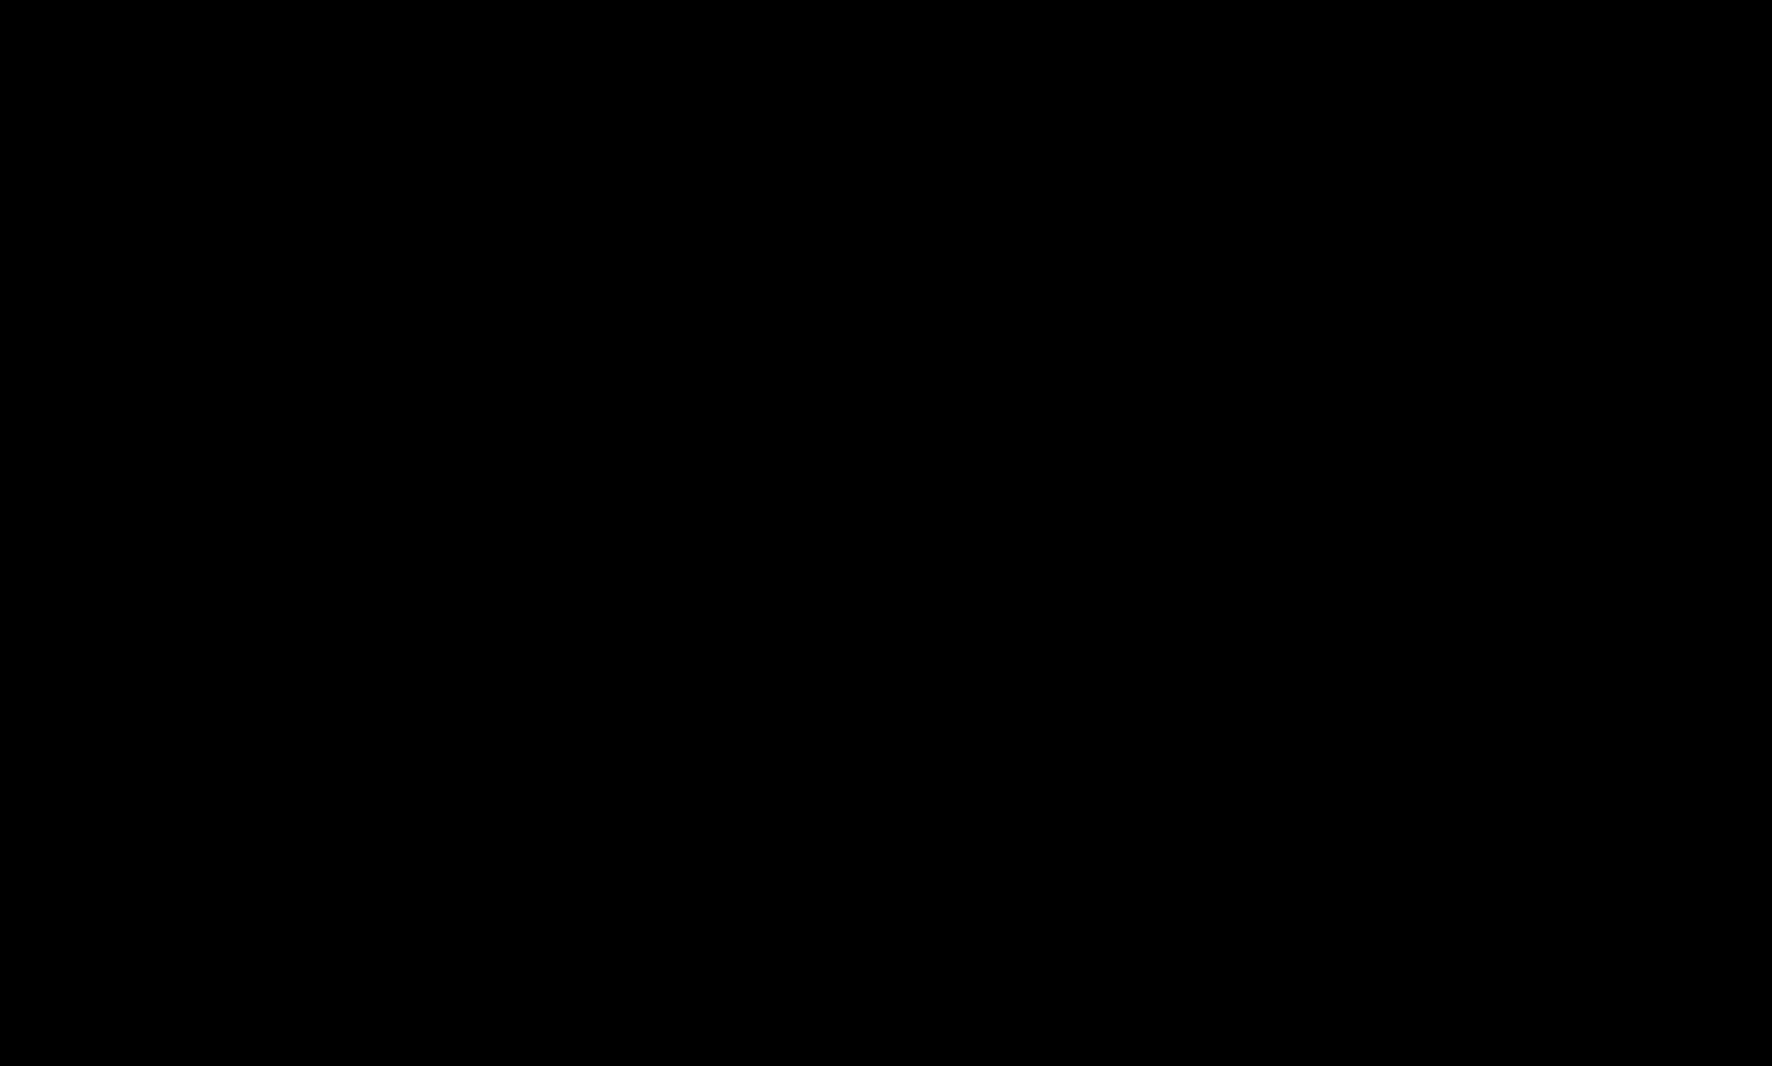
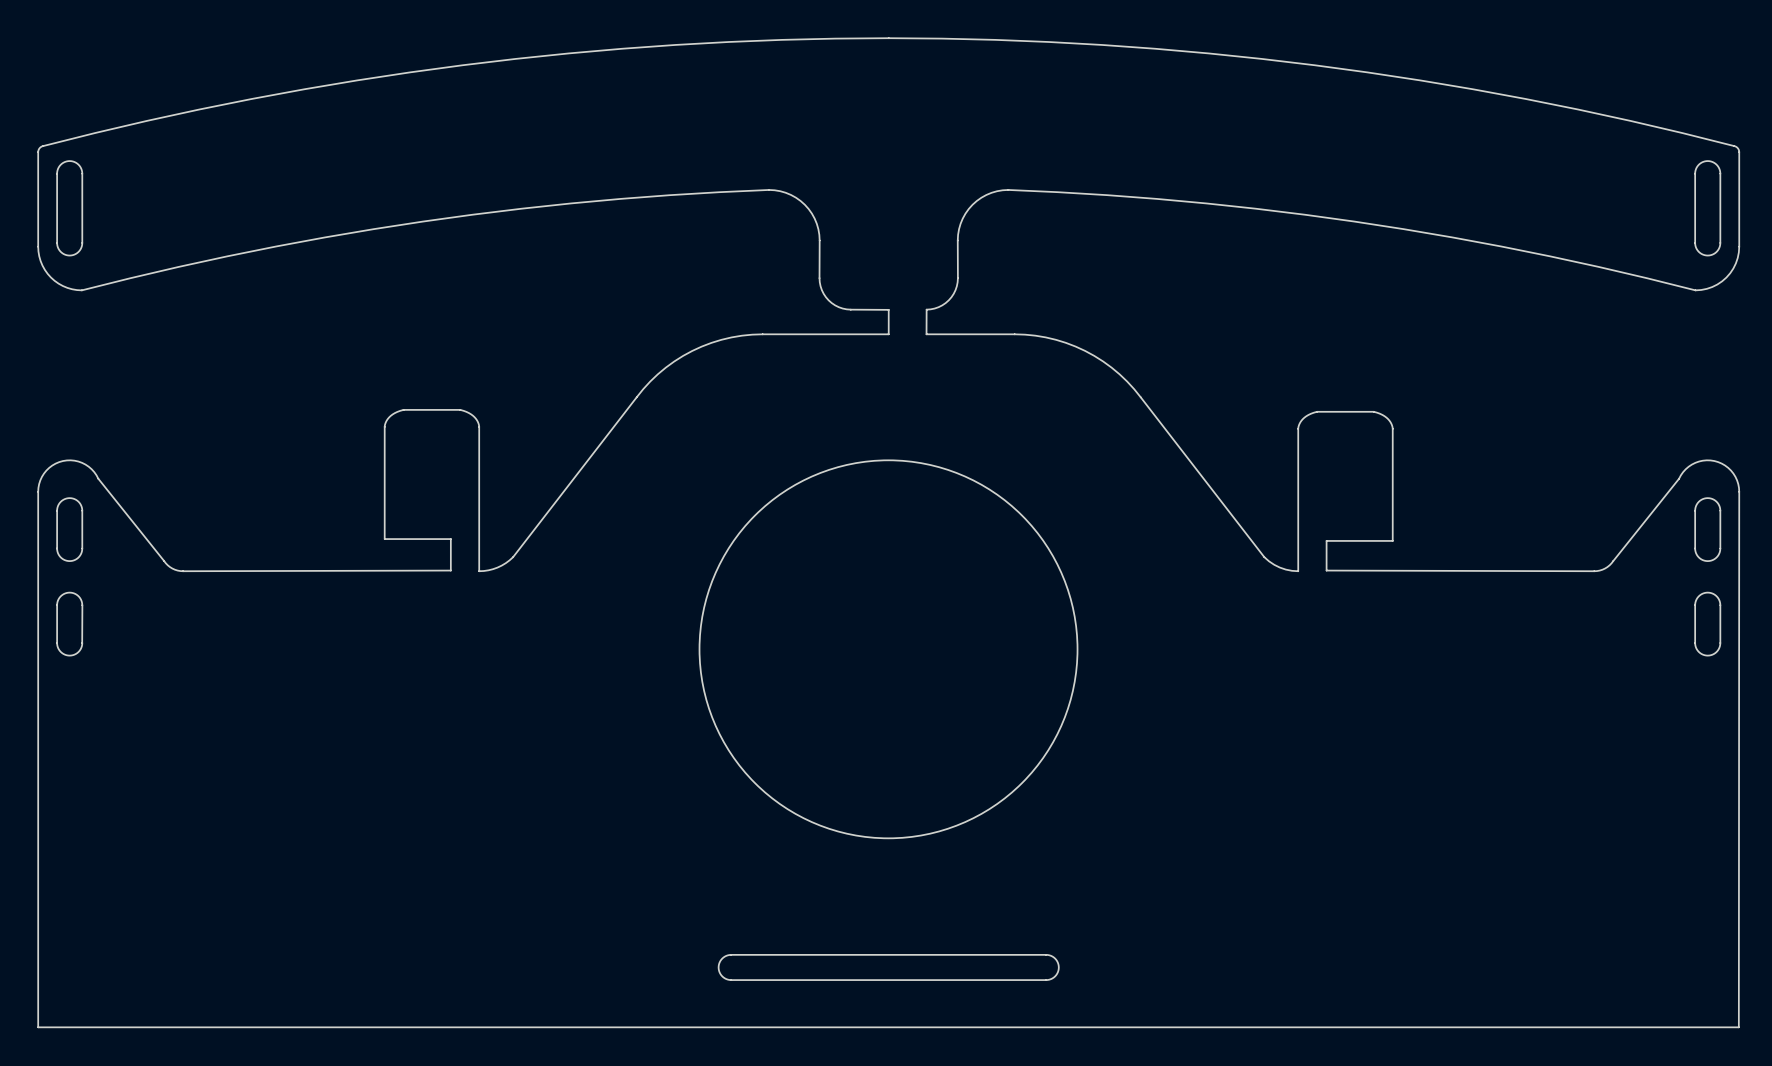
board edge: none -> (888, 38) (781, 39) (675, 44) (568, 53) (462, 65) (356, 80) (251, 99) (147, 120) (39, 148) (39, 256) (44, 269) (50, 277) (58, 283) (72, 289) (81, 290) (178, 266) (275, 246) (422, 221) (521, 208) (620, 198) (769, 189) (785, 192) (796, 197) (804, 204) (814, 218) (819, 234) (819, 282) (825, 297) (835, 305) (846, 309) (888, 309) (888, 334) (741, 335) (711, 342) (683, 355) (657, 374) (643, 389) (513, 557) (501, 565) (488, 570) (479, 571) (479, 425) (473, 415) (460, 409) (403, 409) (390, 415) (384, 426) (384, 539) (450, 539) (450, 570) (177, 570) (165, 563) (88, 466) (78, 461) (66, 460) (49, 467) (40, 480) (38, 491) (38, 1027) (1738, 1027) (1739, 491) (1737, 480) (1728, 467) (1710, 460) (1699, 461) (1688, 466) (1611, 563) (1599, 570) (1326, 570) (1326, 540) (1392, 540) (1392, 428) (1386, 417) (1373, 411) (1317, 411) (1304, 417) (1298, 427) (1298, 571) (1291, 570) (1274, 564) (1264, 557) (1134, 389) (1103, 361) (1065, 342) (1035, 335) (926, 334) (926, 309) (938, 307) (945, 303) (951, 297) (956, 286) (958, 234) (962, 218) (976, 200) (986, 194) (1002, 190) (1157, 198) (1256, 208) (1354, 221) (1452, 237) (1550, 256) (1695, 290) (1706, 288) (1726, 277) (1737, 257) (1737, 148) (1630, 120) (1525, 99) (1420, 80) (1314, 65) (1208, 53) (1102, 44) (995, 39) (888, 38)
board edge: none -> (57, 173) (57, 244) (62, 253) (71, 255) (78, 252) (82, 244) (82, 172) (78, 164) (69, 161) (60, 164) (57, 173)
board edge: none -> (1695, 173) (1695, 244) (1700, 252) (1709, 255) (1716, 251) (1720, 244) (1720, 172) (1714, 163) (1706, 161) (1698, 165) (1695, 173)
round board edge: none -> [699, 459, 1078, 839]
board edge: none -> (57, 510) (57, 552) (63, 559) (74, 560) (80, 555) (82, 550) (81, 505) (74, 499) (66, 498) (59, 503) (57, 510)
board edge: none -> (1695, 510) (1695, 551) (1701, 559) (1711, 560) (1717, 556) (1720, 550) (1719, 507) (1715, 500) (1706, 498) (1698, 501) (1695, 510)
board edge: none -> (82, 605) (79, 596) (69, 592) (60, 596) (57, 605) (58, 649) (64, 654) (72, 655) (79, 650) (82, 643)
board edge: none -> (82, 605) (82, 643)
board edge: none -> (1695, 605) (1695, 646) (1701, 653) (1711, 655) (1717, 650) (1720, 644) (1719, 600) (1713, 594) (1704, 592) (1697, 598) (1695, 605)
board edge: none -> (731, 954) (1046, 954) (1055, 958) (1058, 967) (1055, 976) (1046, 980) (731, 980) (722, 976) (718, 967) (722, 958) (731, 954)

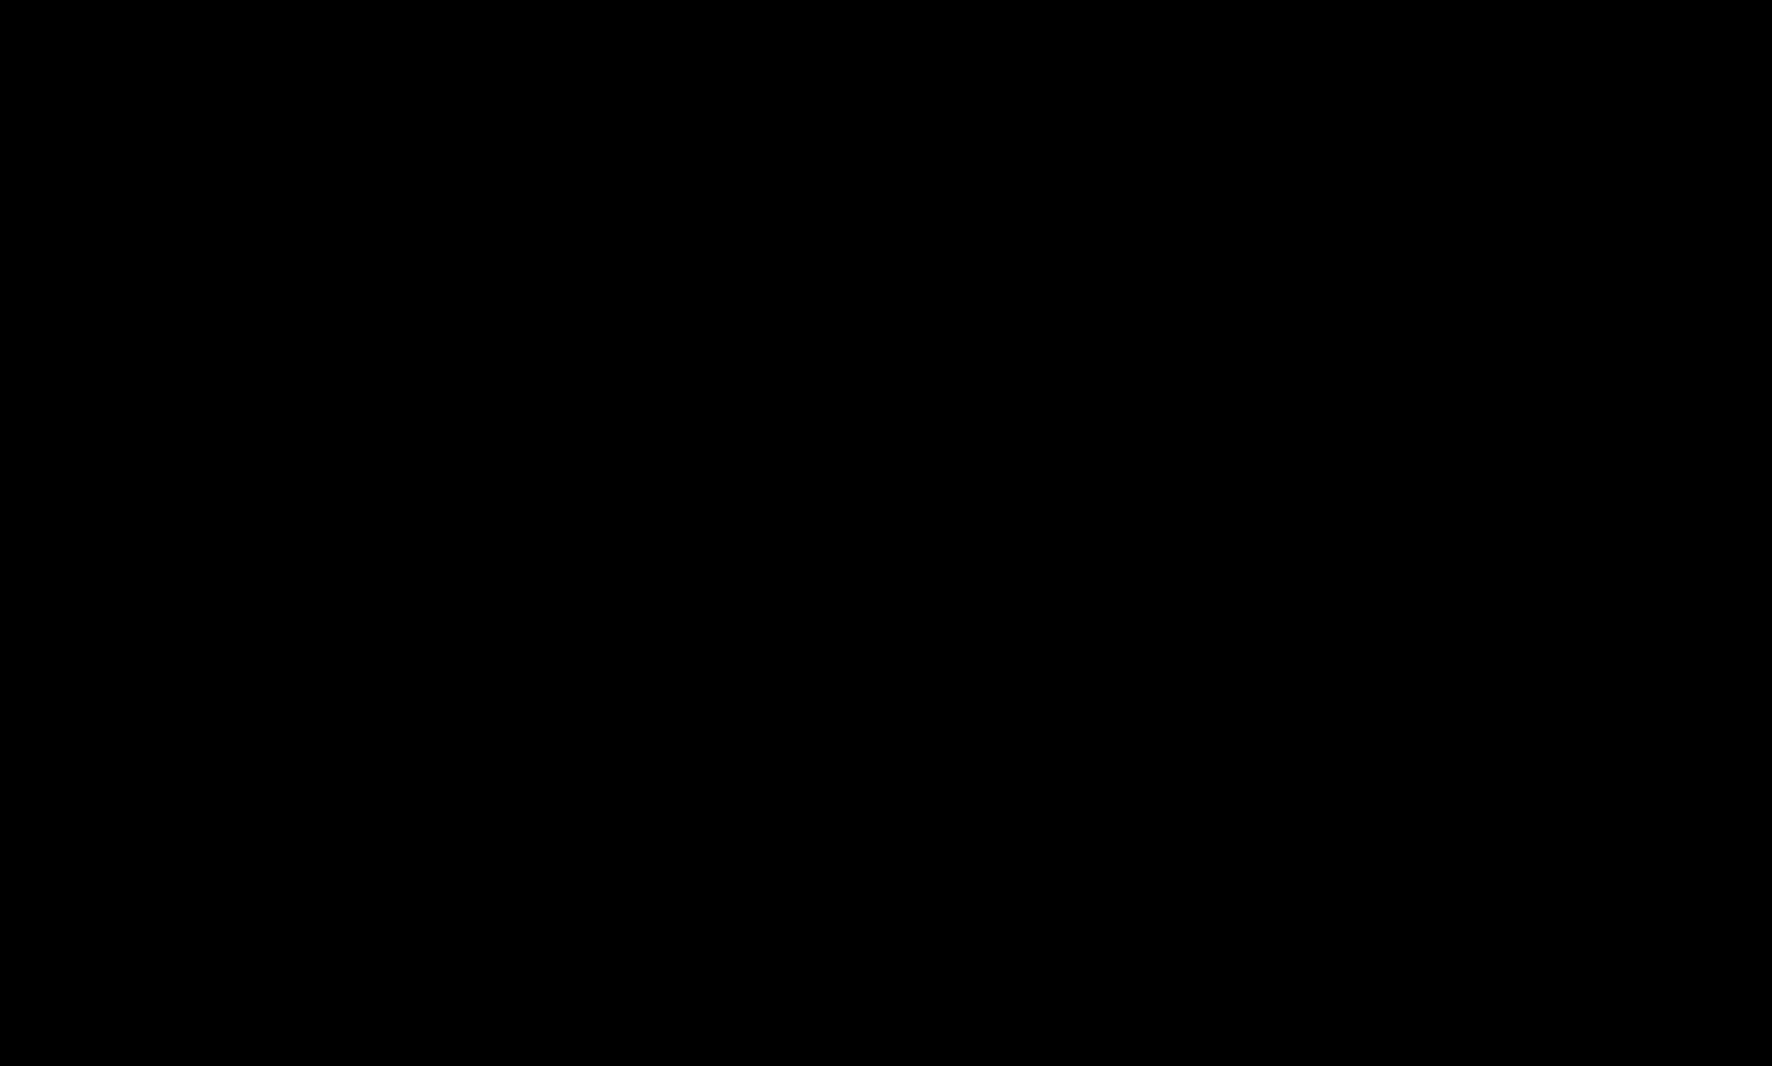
board edge: (888, 38) (781, 39) (675, 44) (568, 53) (462, 65) (356, 80) (251, 99) (147, 120) (39, 148) (39, 256) (44, 269) (50, 277) (58, 283) (72, 289) (81, 290) (178, 266) (275, 246) (422, 221) (521, 208) (620, 198) (769, 189) (785, 192) (796, 197) (804, 204) (814, 218) (819, 234) (819, 282) (825, 297) (835, 305) (846, 309) (888, 309) (888, 334) (741, 335) (711, 342) (683, 355) (657, 374) (643, 389) (513, 557) (501, 565) (488, 570) (479, 571) (479, 425) (473, 415) (460, 409) (403, 409) (390, 415) (384, 426) (384, 539) (450, 539) (450, 570) (177, 570) (165, 563) (88, 466) (78, 461) (66, 460) (49, 467) (40, 480) (38, 491) (38, 1027) (1738, 1027) (1739, 491) (1737, 480) (1728, 467) (1710, 460) (1699, 461) (1688, 466) (1611, 563) (1599, 570) (1326, 570) (1326, 540) (1392, 540) (1392, 428) (1386, 417) (1373, 411) (1317, 411) (1304, 417) (1298, 427) (1298, 571) (1291, 570) (1274, 564) (1264, 557) (1134, 389) (1103, 361) (1065, 342) (1035, 335) (926, 334) (926, 309) (938, 307) (945, 303) (951, 297) (956, 286) (958, 234) (962, 218) (976, 200) (986, 194) (1002, 190) (1157, 198) (1256, 208) (1354, 221) (1452, 237) (1550, 256) (1695, 290) (1706, 288) (1726, 277) (1737, 257) (1737, 148) (1630, 120) (1525, 99) (1420, 80) (1314, 65) (1208, 53) (1102, 44) (995, 39) (888, 38) -> none
board edge: (57, 173) (57, 244) (62, 253) (71, 255) (78, 252) (82, 244) (82, 172) (78, 164) (69, 161) (60, 164) (57, 173) -> none
board edge: (1695, 173) (1695, 244) (1700, 252) (1709, 255) (1716, 251) (1720, 244) (1720, 172) (1714, 163) (1706, 161) (1698, 165) (1695, 173) -> none
round board edge: [699, 459, 1078, 839] -> none
board edge: (57, 510) (57, 552) (63, 559) (74, 560) (80, 555) (82, 550) (81, 505) (74, 499) (66, 498) (59, 503) (57, 510) -> none
board edge: (1695, 510) (1695, 551) (1701, 559) (1711, 560) (1717, 556) (1720, 550) (1719, 507) (1715, 500) (1706, 498) (1698, 501) (1695, 510) -> none
board edge: (82, 605) (79, 596) (69, 592) (60, 596) (57, 605) (58, 649) (64, 654) (72, 655) (79, 650) (82, 643) -> none
board edge: (82, 605) (82, 643) -> none
board edge: (1695, 605) (1695, 646) (1701, 653) (1711, 655) (1717, 650) (1720, 644) (1719, 600) (1713, 594) (1704, 592) (1697, 598) (1695, 605) -> none
board edge: (731, 954) (1046, 954) (1055, 958) (1058, 967) (1055, 976) (1046, 980) (731, 980) (722, 976) (718, 967) (722, 958) (731, 954) -> none

